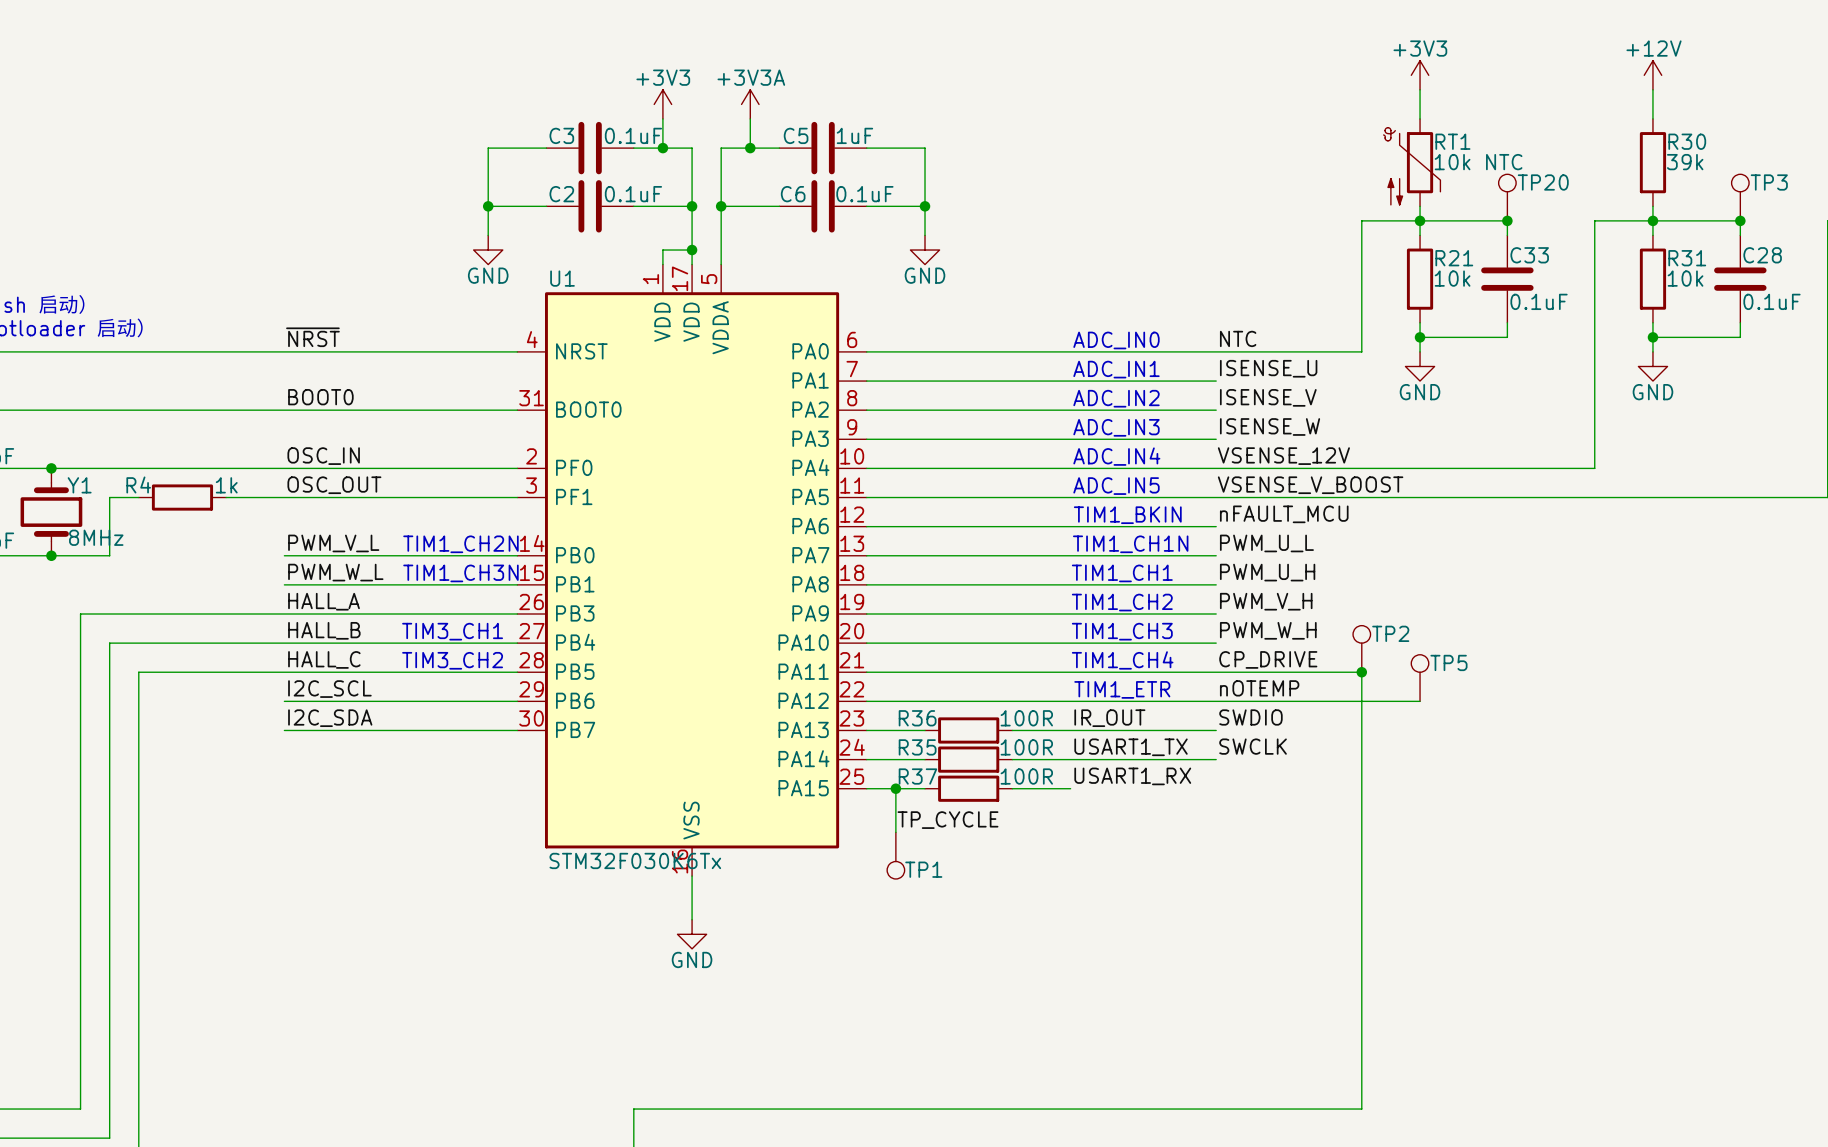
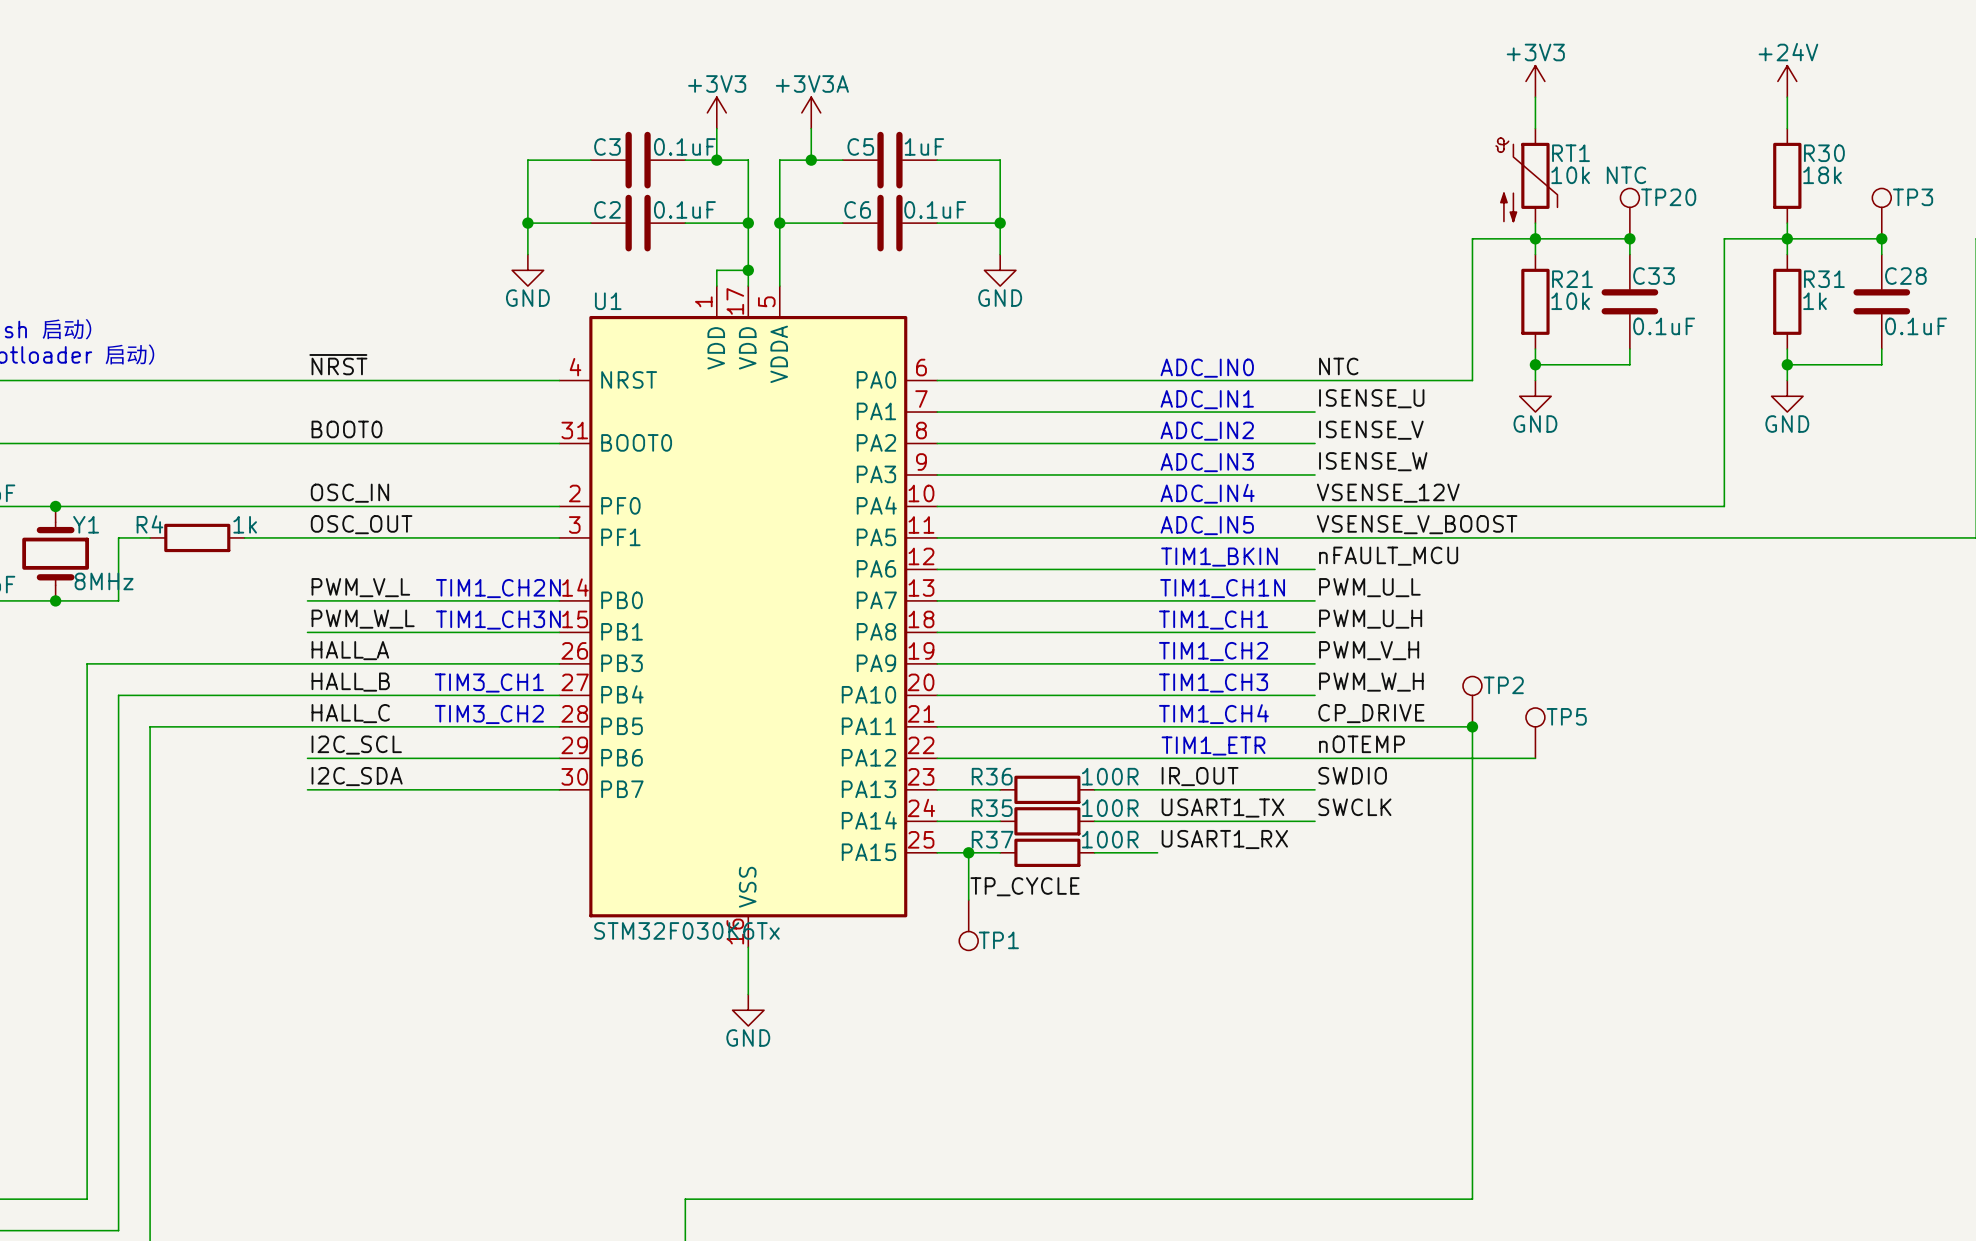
power symbol: +12V (1652, 75) -> +24V (1787, 81)
R30 value: 39k (1685, 162) -> 18k (1822, 175)
R31 value: 10k (1685, 278) -> 1k (1815, 301)

